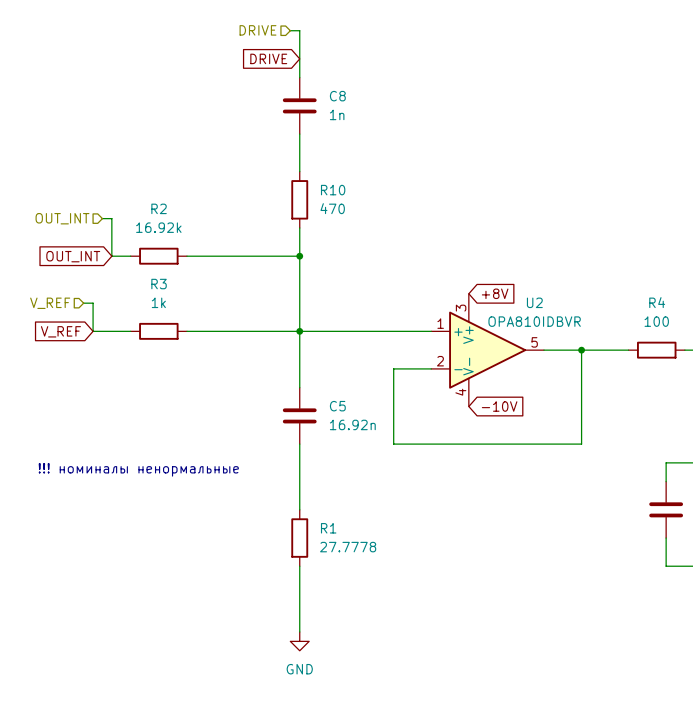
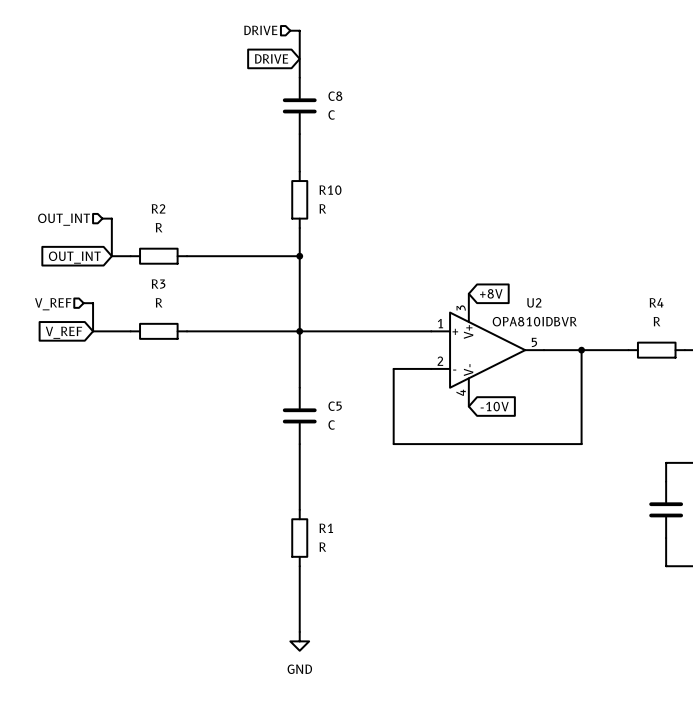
C8 value: 1n (337, 114) -> C (331, 114)
R10 value: 470 (332, 208) -> R (322, 208)
R2 value: 16.92k (158, 227) -> R (159, 227)
R3 value: 1k (158, 302) -> R (159, 302)
R4 value: 100 (656, 321) -> R (657, 321)
C5 value: 16.92n (352, 424) -> C (331, 425)
text: !!! номиналы ненормальные (138, 469) -> none
R1 value: 27.7778 (348, 547) -> R (322, 547)

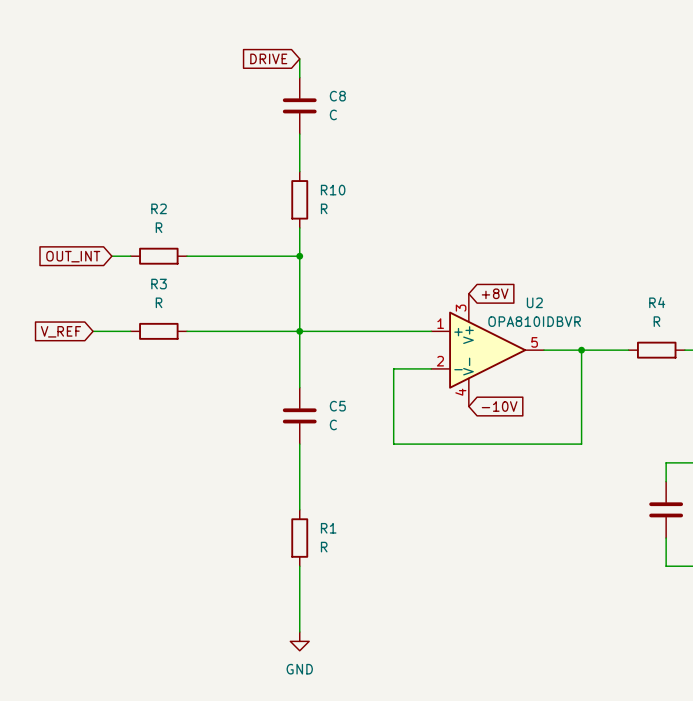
hierarchical label: DRIVE (260, 30) -> none
wire: (290, 30) (299, 30) (299, 58) -> none
wire: (102, 218) (111, 218) (111, 256) -> none
hierarchical label: OUT_INT (64, 219) -> none
wire: (83, 303) (93, 303) (93, 331) -> none
hierarchical label: V_REF (53, 304) -> none

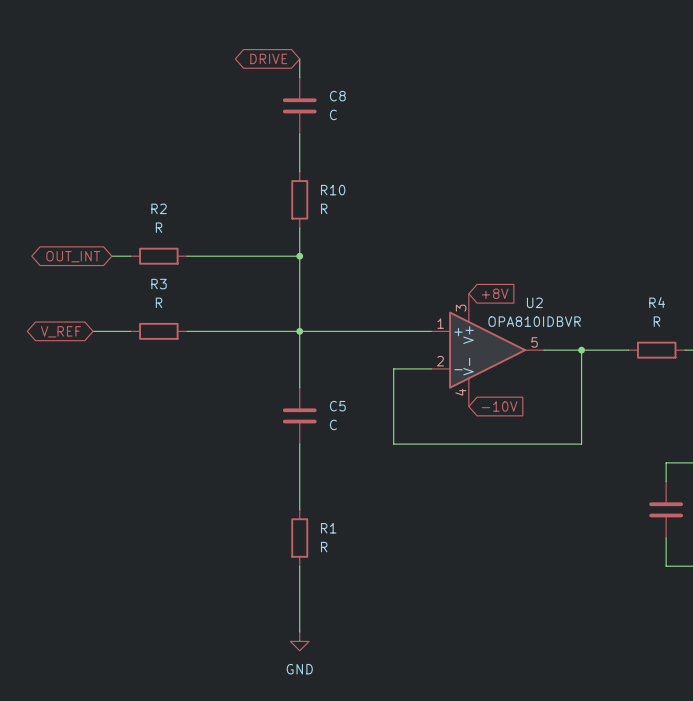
global label shape: input (268, 58) -> bidirectional (268, 58)
global label shape: input (73, 256) -> bidirectional (73, 256)
global label shape: input (60, 331) -> bidirectional (60, 331)

